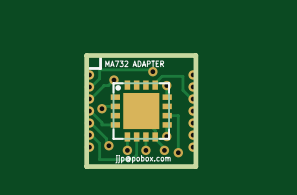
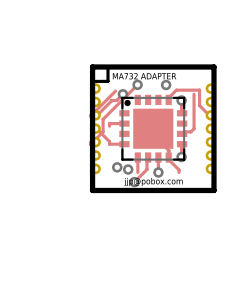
track: none -> (137, 84) (103, 119) (103, 131) (90, 144) (90, 142)
via: none -> (137, 84)
track: (152, 71) (151, 69) (99, 69) (99, 78) (89, 86) -> none
track: none -> (115, 91) (90, 115)
via: (101, 108) -> none
track: (167, 115) (178, 115) (178, 152) -> (182, 133) (190, 131) (194, 128) (194, 94)
track: (89, 123) (106, 138) (108, 145) -> none
track: (89, 135) (99, 143) (99, 159) (132, 159) (136, 155) (136, 136) -> (134, 182) (147, 169) (148, 157)
via: none -> (128, 169)
via: (127, 150) -> none
via: (164, 150) -> none
via: (178, 152) -> none
via: none -> (134, 182)

